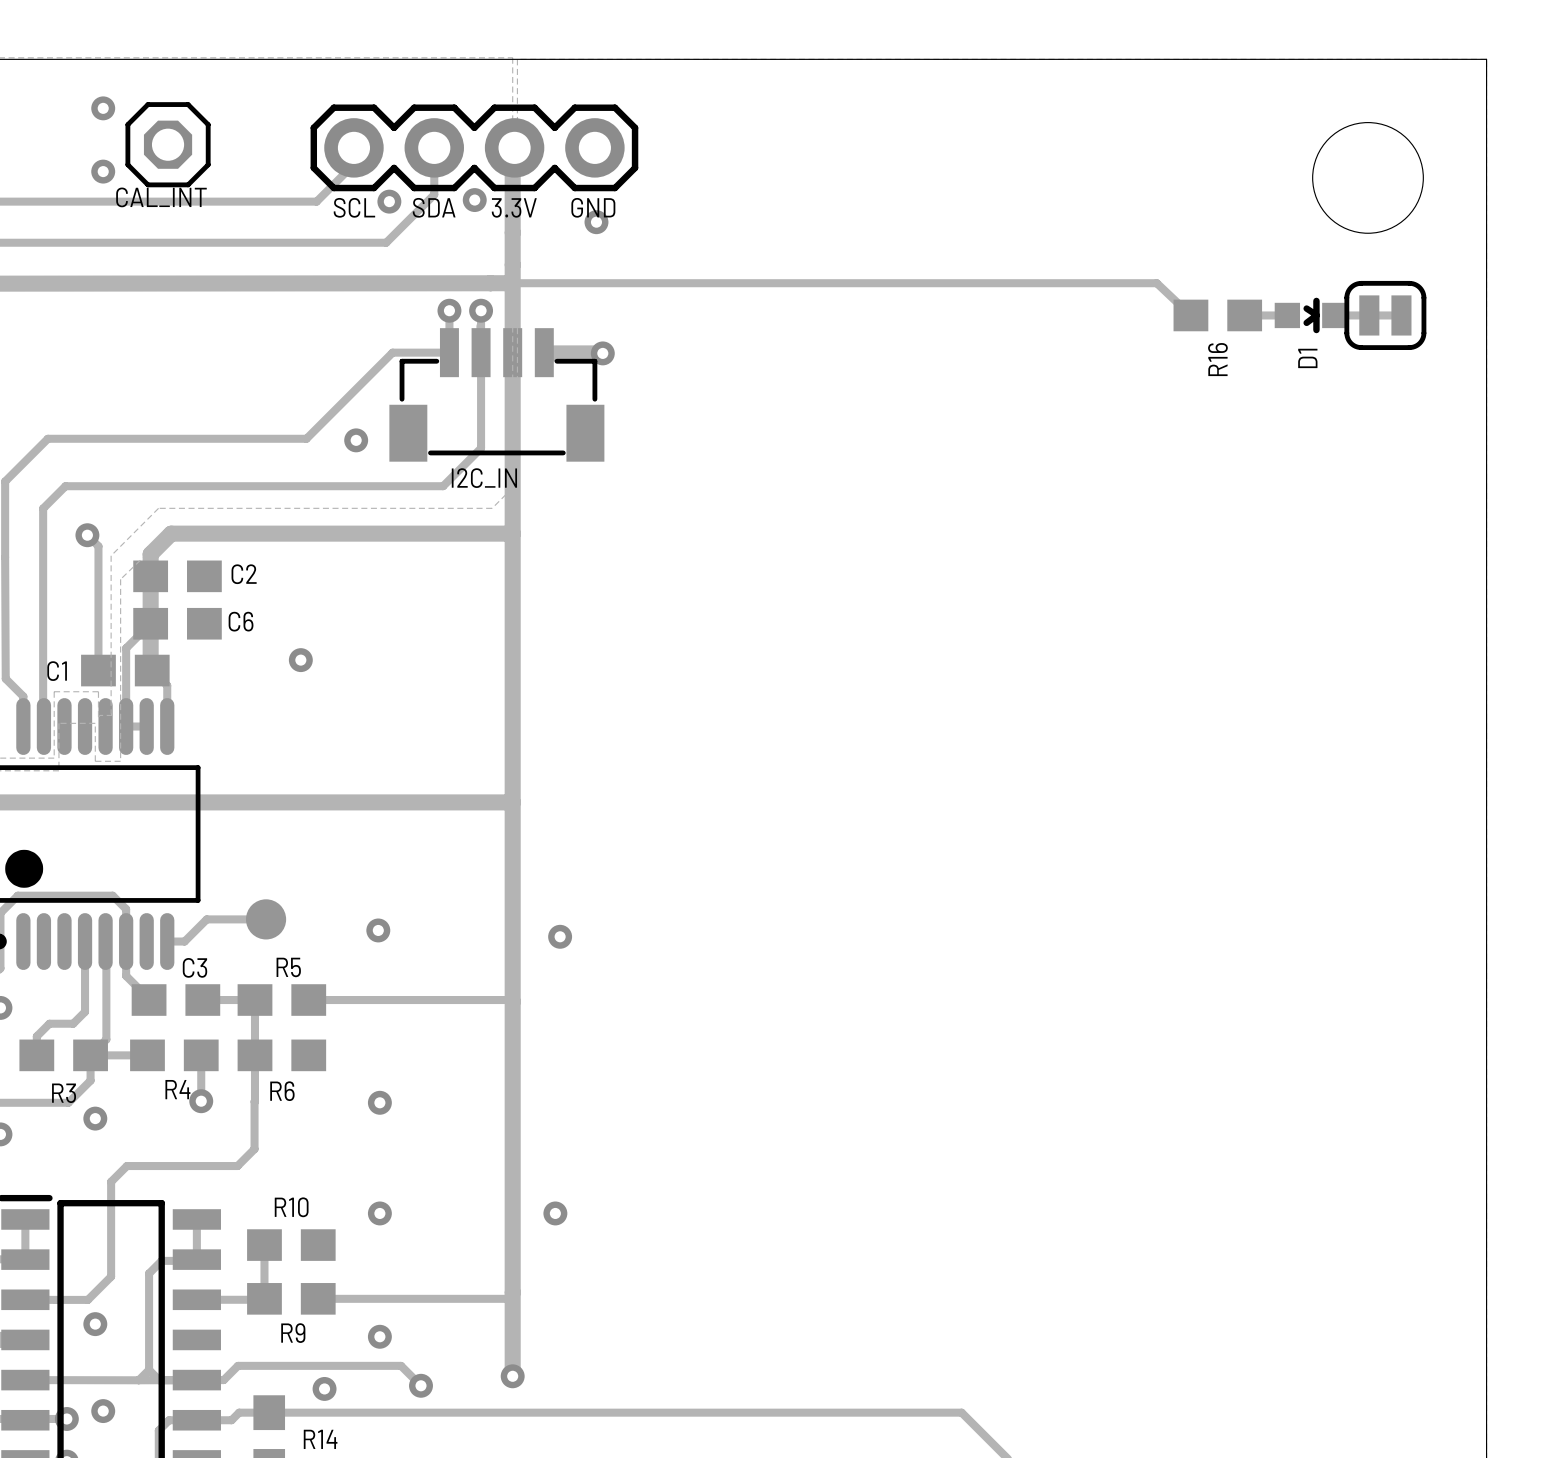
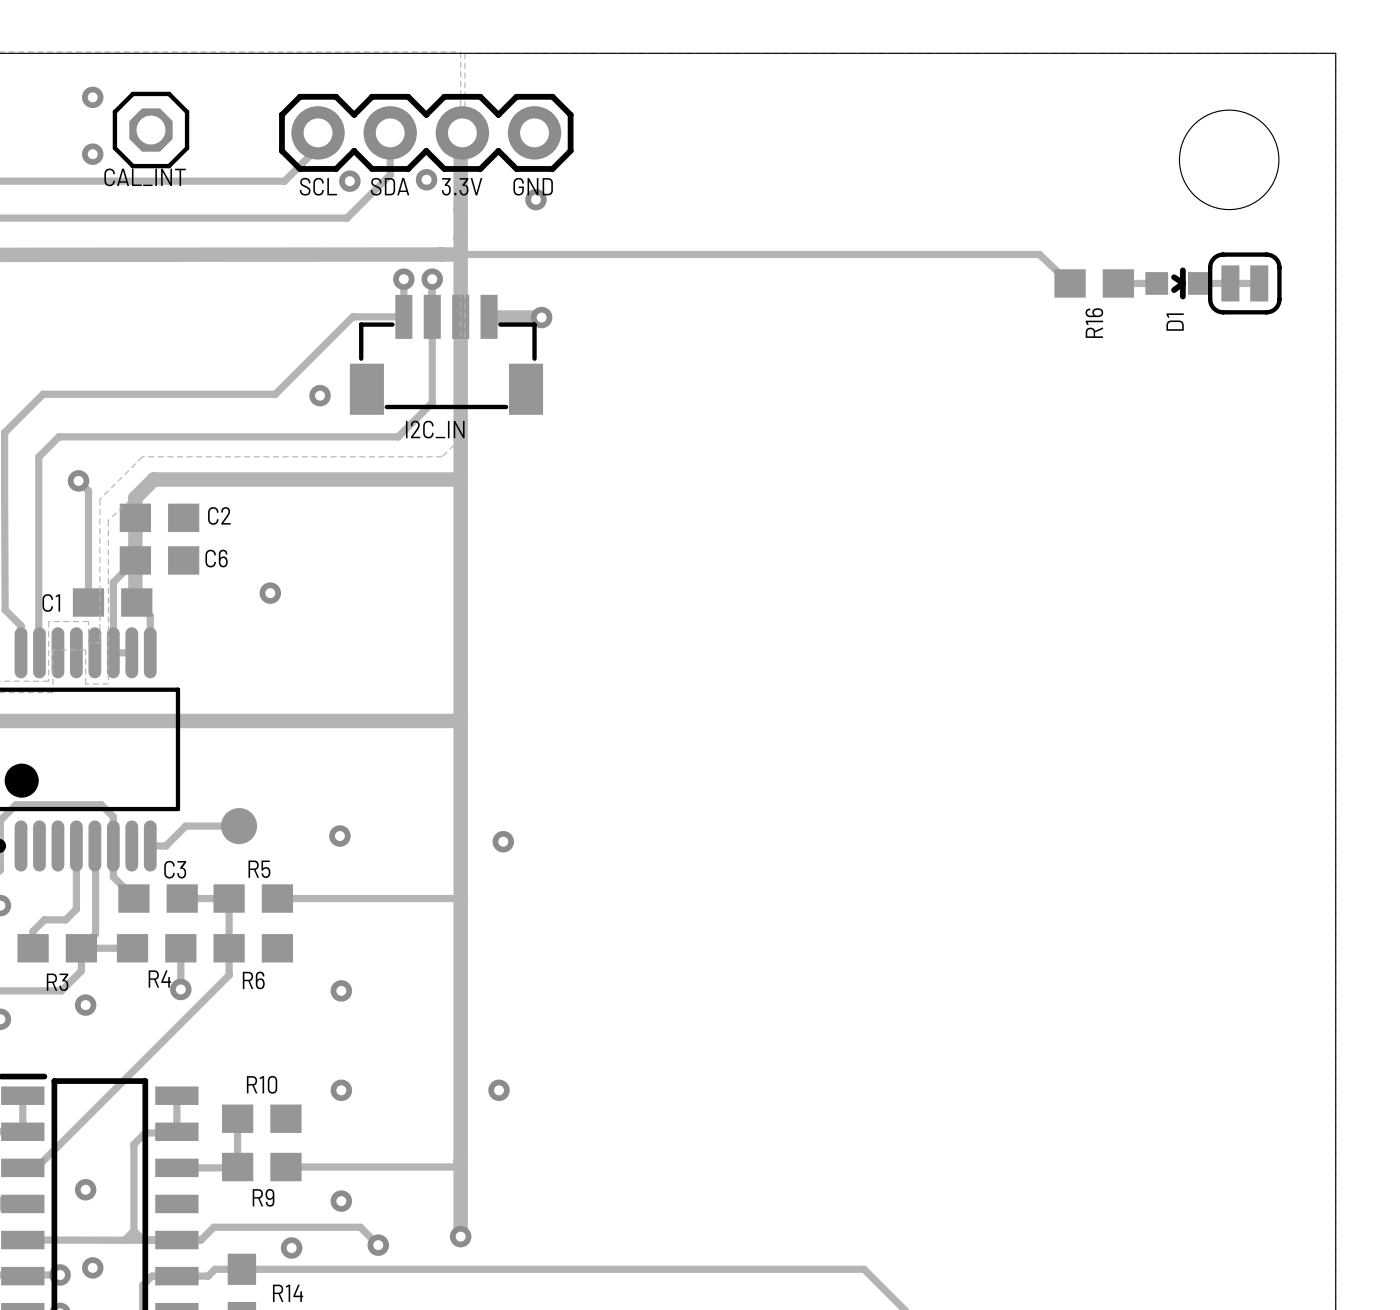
track: (254, 1085) (254, 1101) -> none
track: (254, 1101) (254, 1149) (237, 1166) (126, 1166) (111, 1181) (111, 1276) (87, 1299) (40, 1299) -> (229, 975) (36, 1167)

